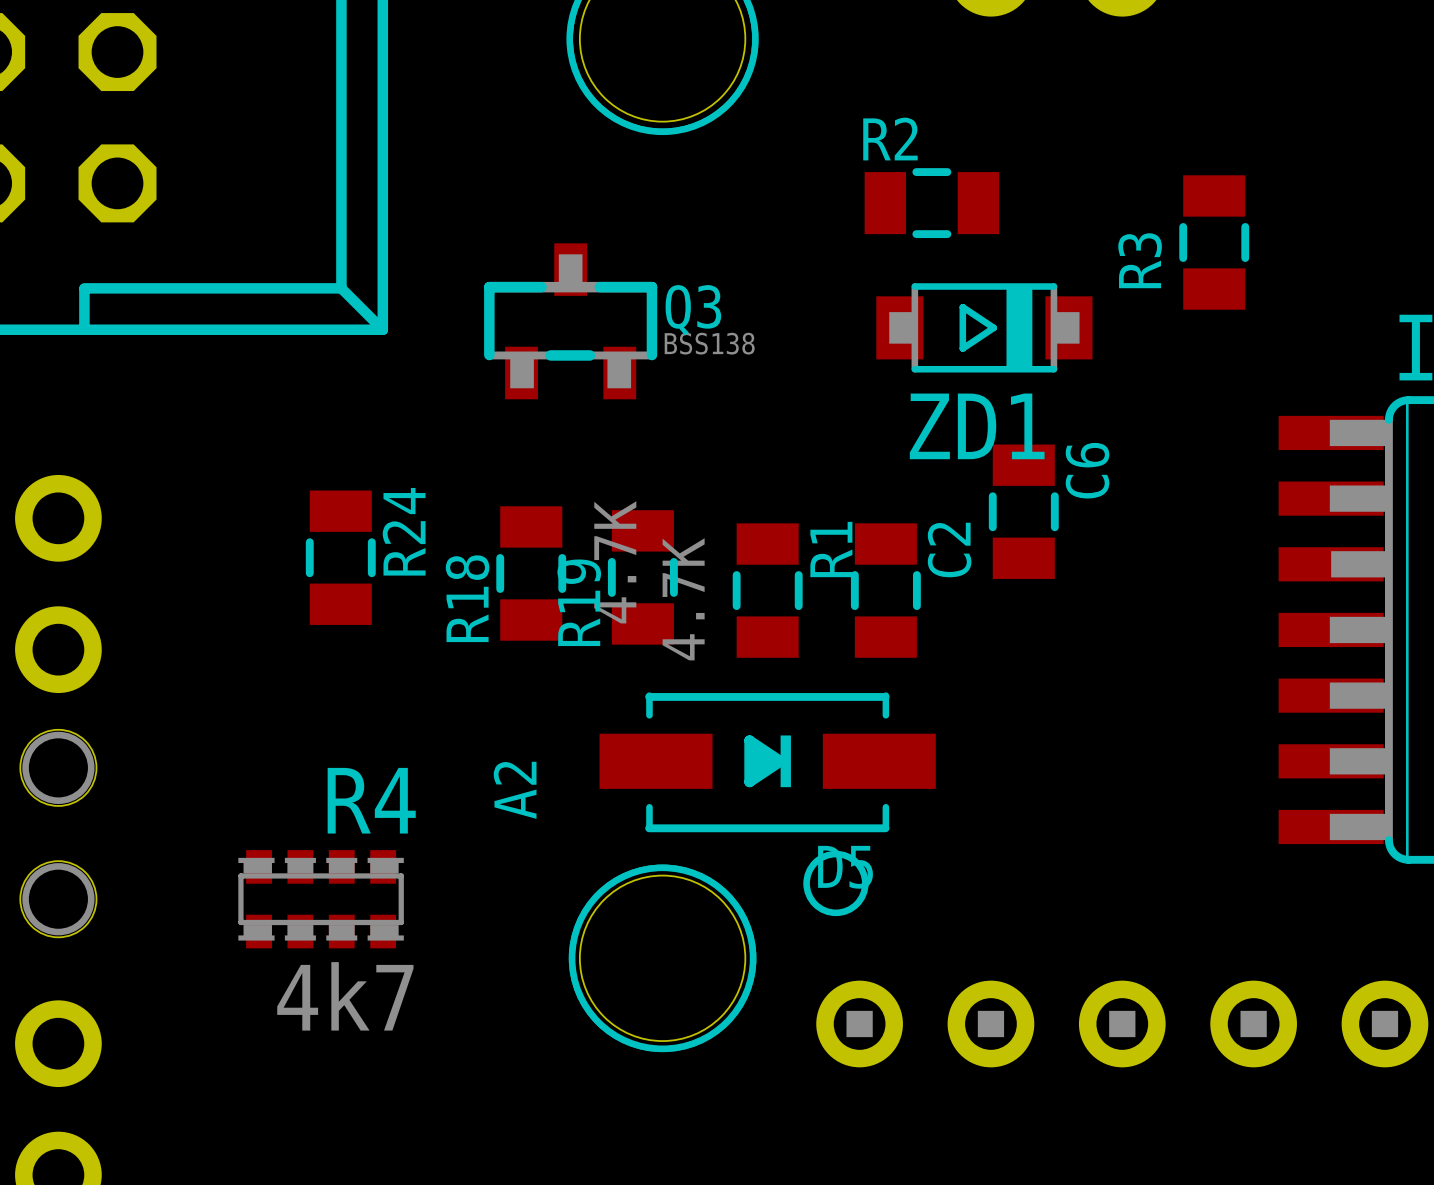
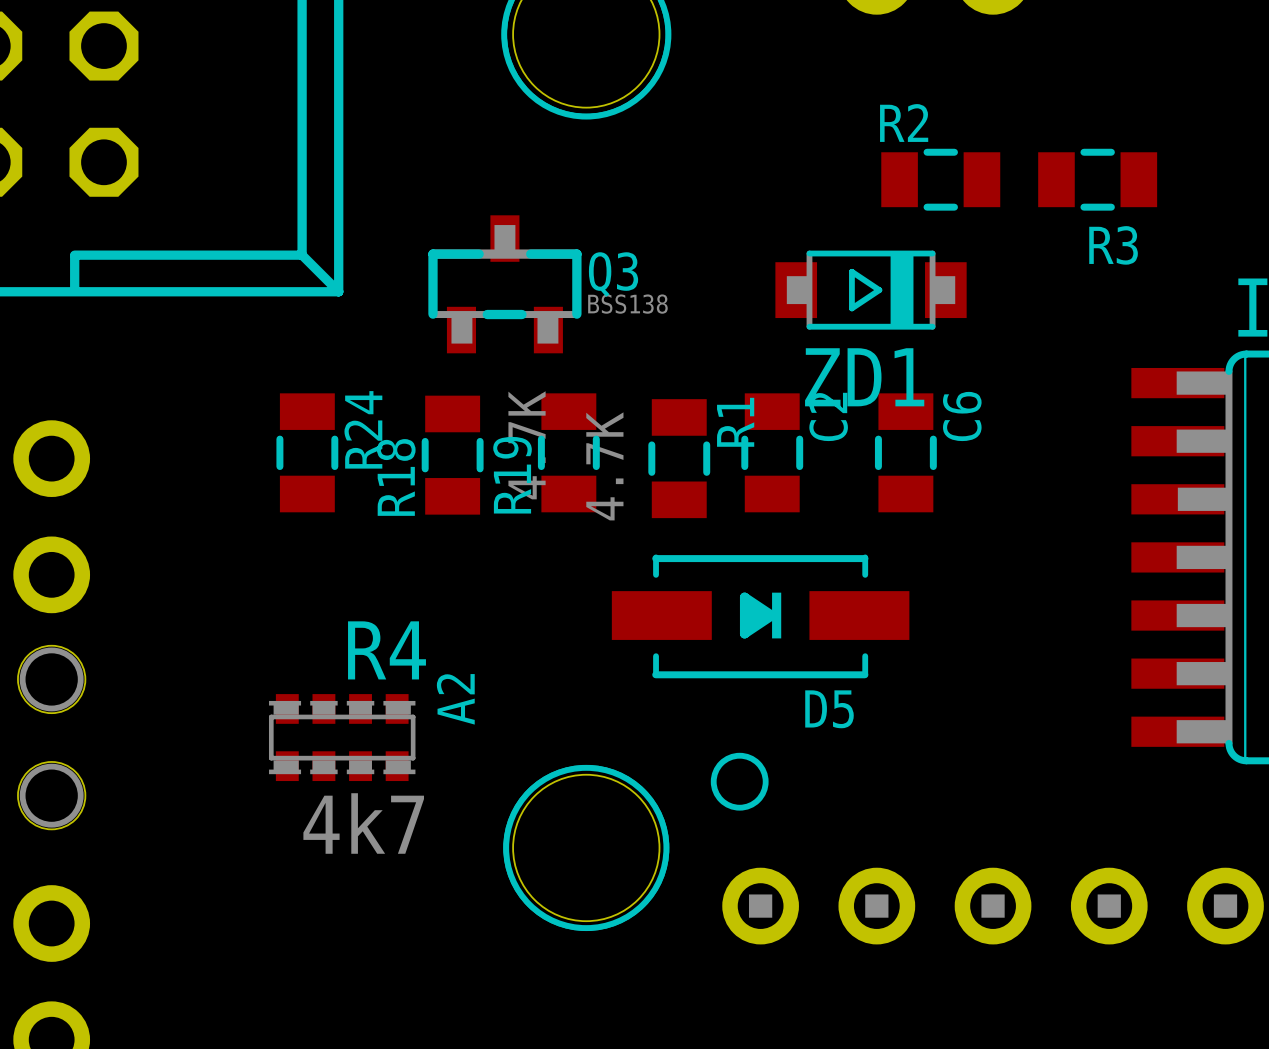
R2 position: (931, 203) -> (940, 179)
R3 rotation: 0° (1214, 242) -> 90° clockwise (1097, 179)
R3 name position: R3 (1140, 260) -> R3 (1113, 245)
R24 position: (340, 557) -> (307, 452)
R18 position: (531, 573) -> (452, 455)
R19 position: (642, 577) -> (568, 452)
R1 position: (767, 590) -> (679, 458)
C2 position: (885, 590) -> (772, 452)
D5 position: (767, 762) -> (760, 616)
R4 position: (321, 899) -> (342, 737)

